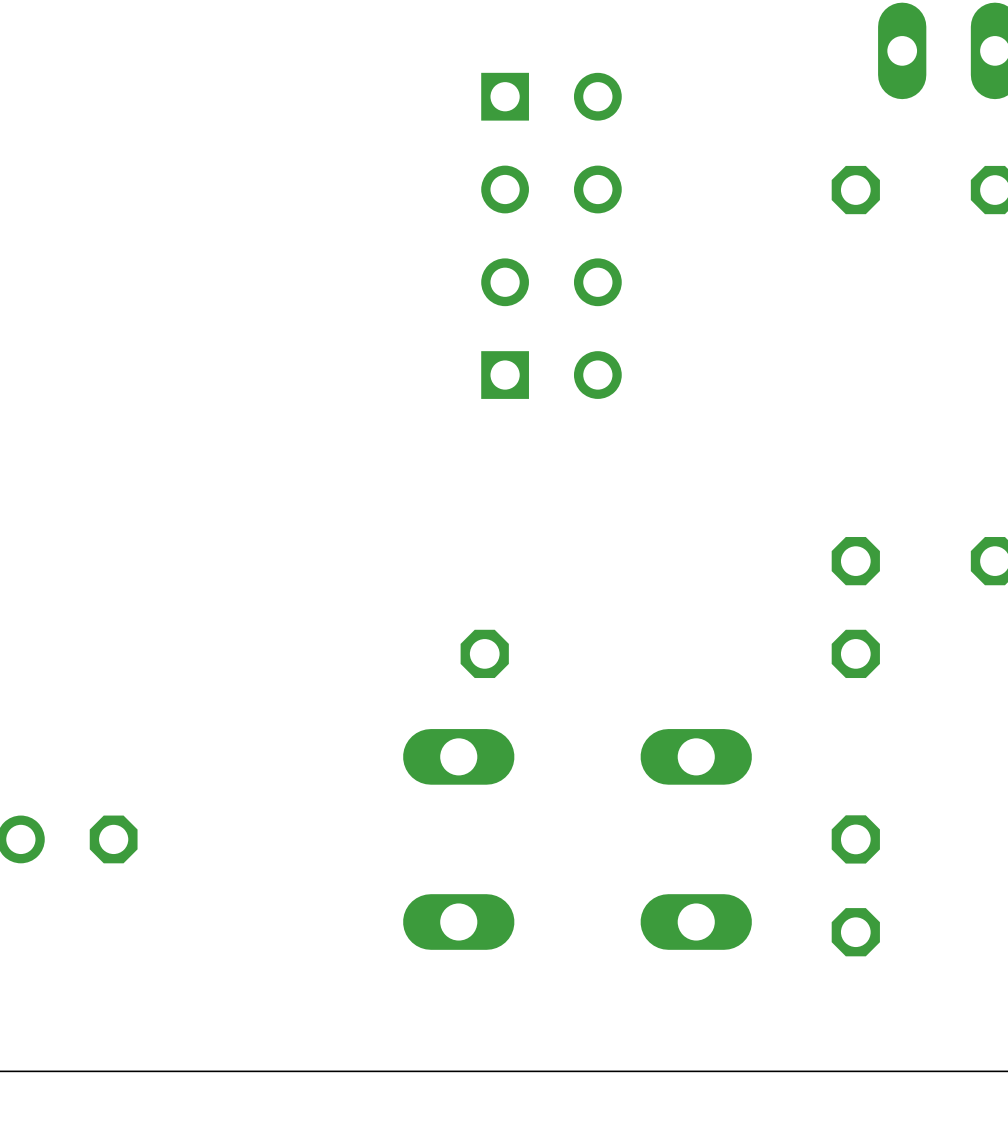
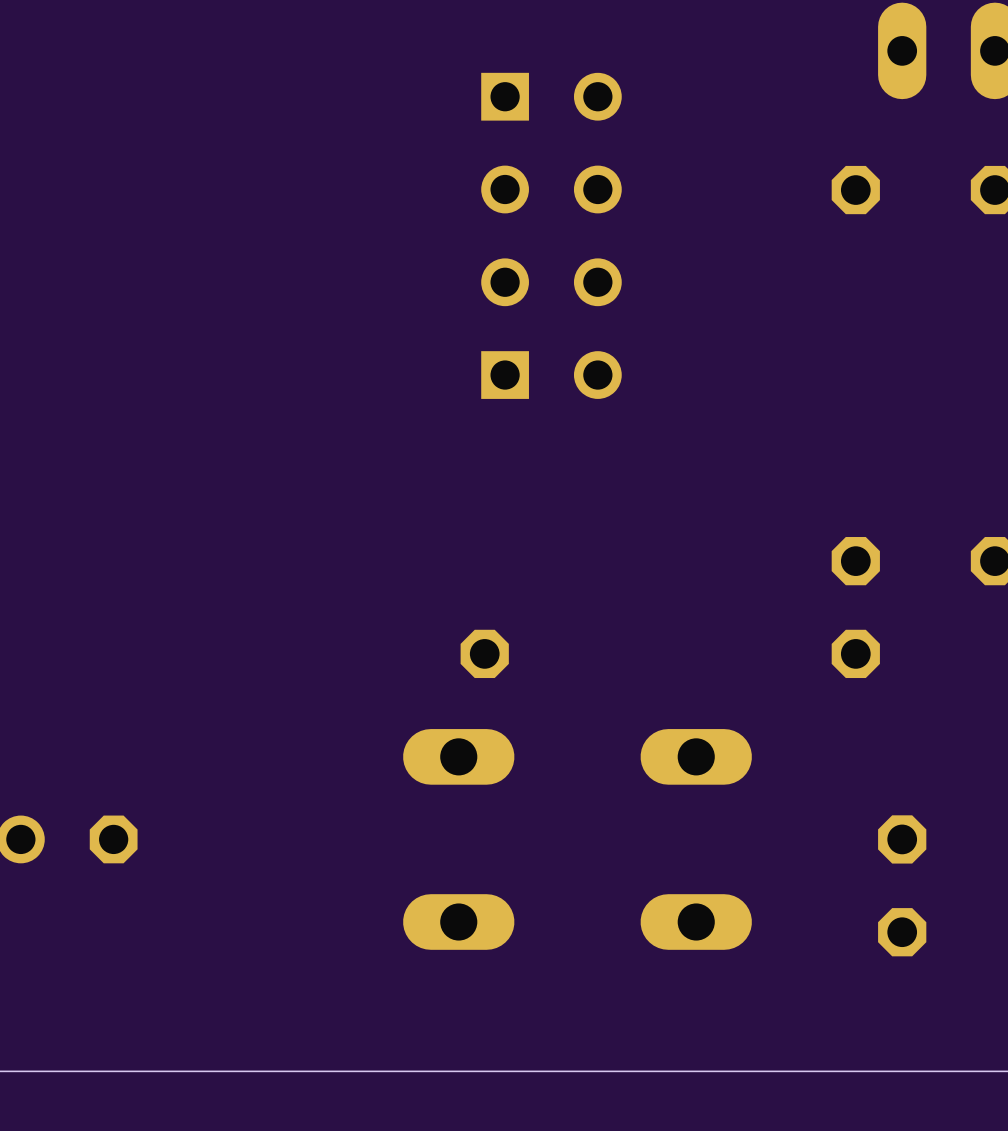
part position: (855, 885) -> (902, 885)

